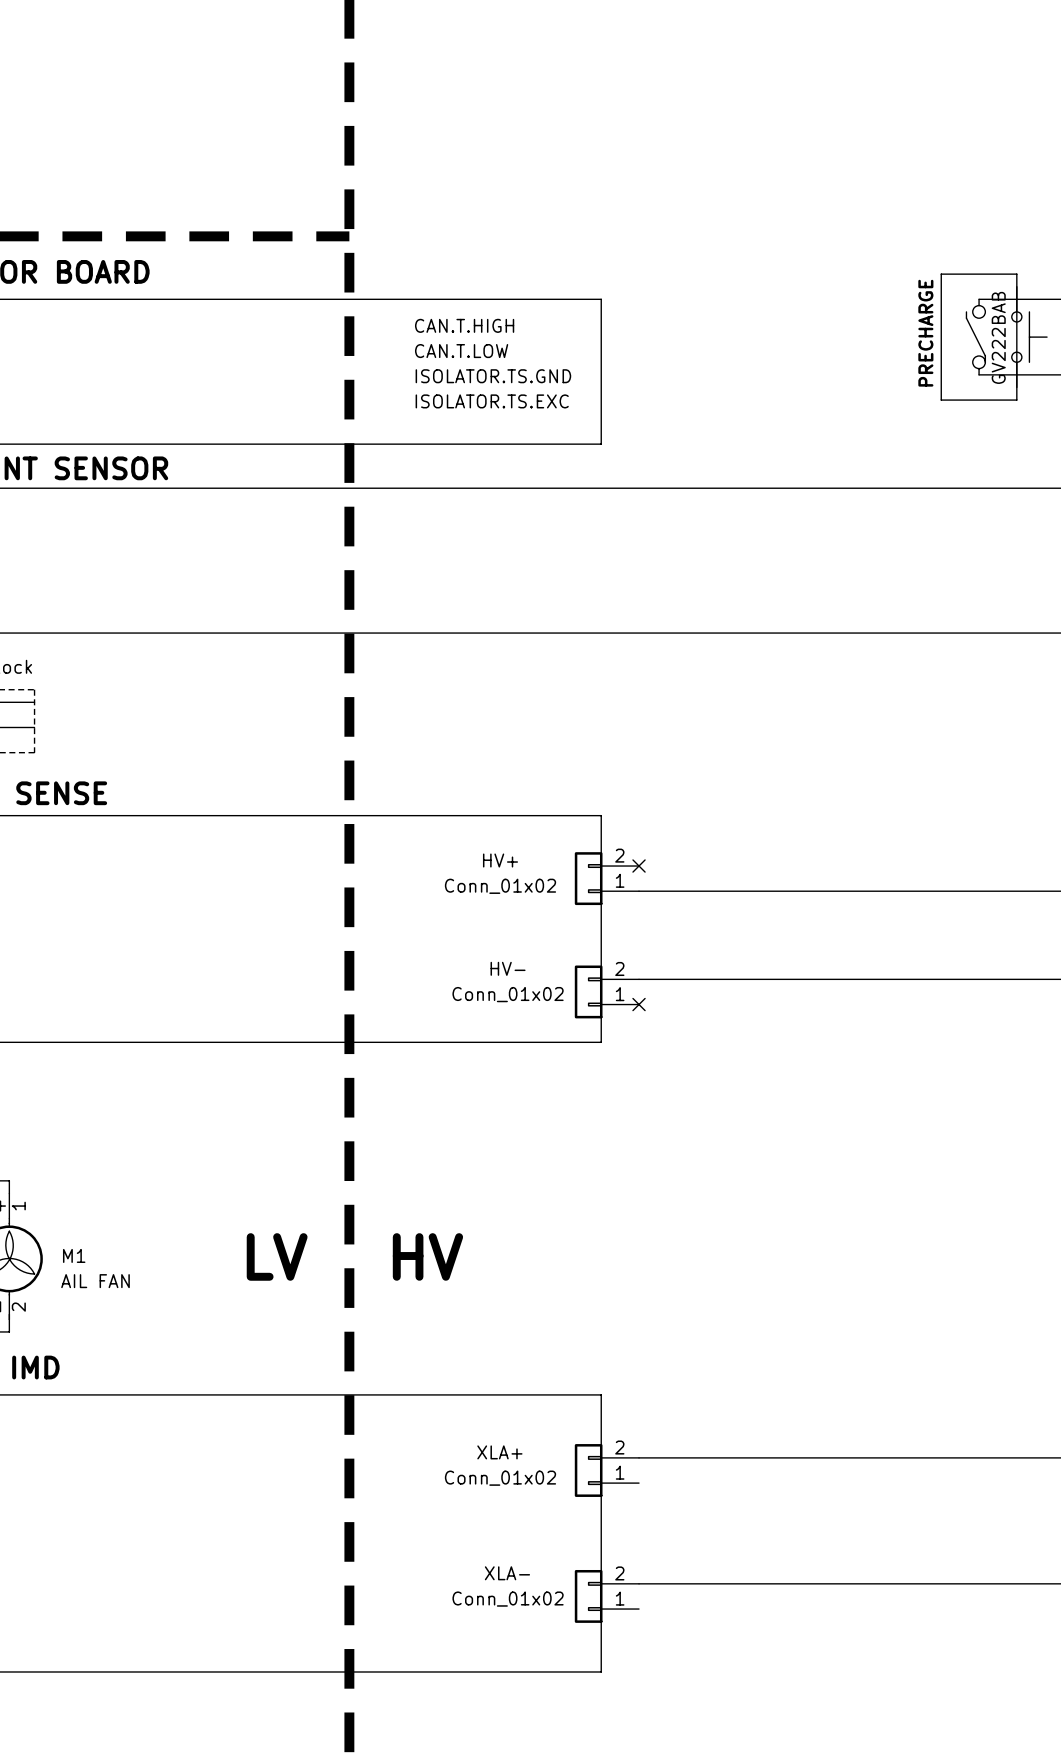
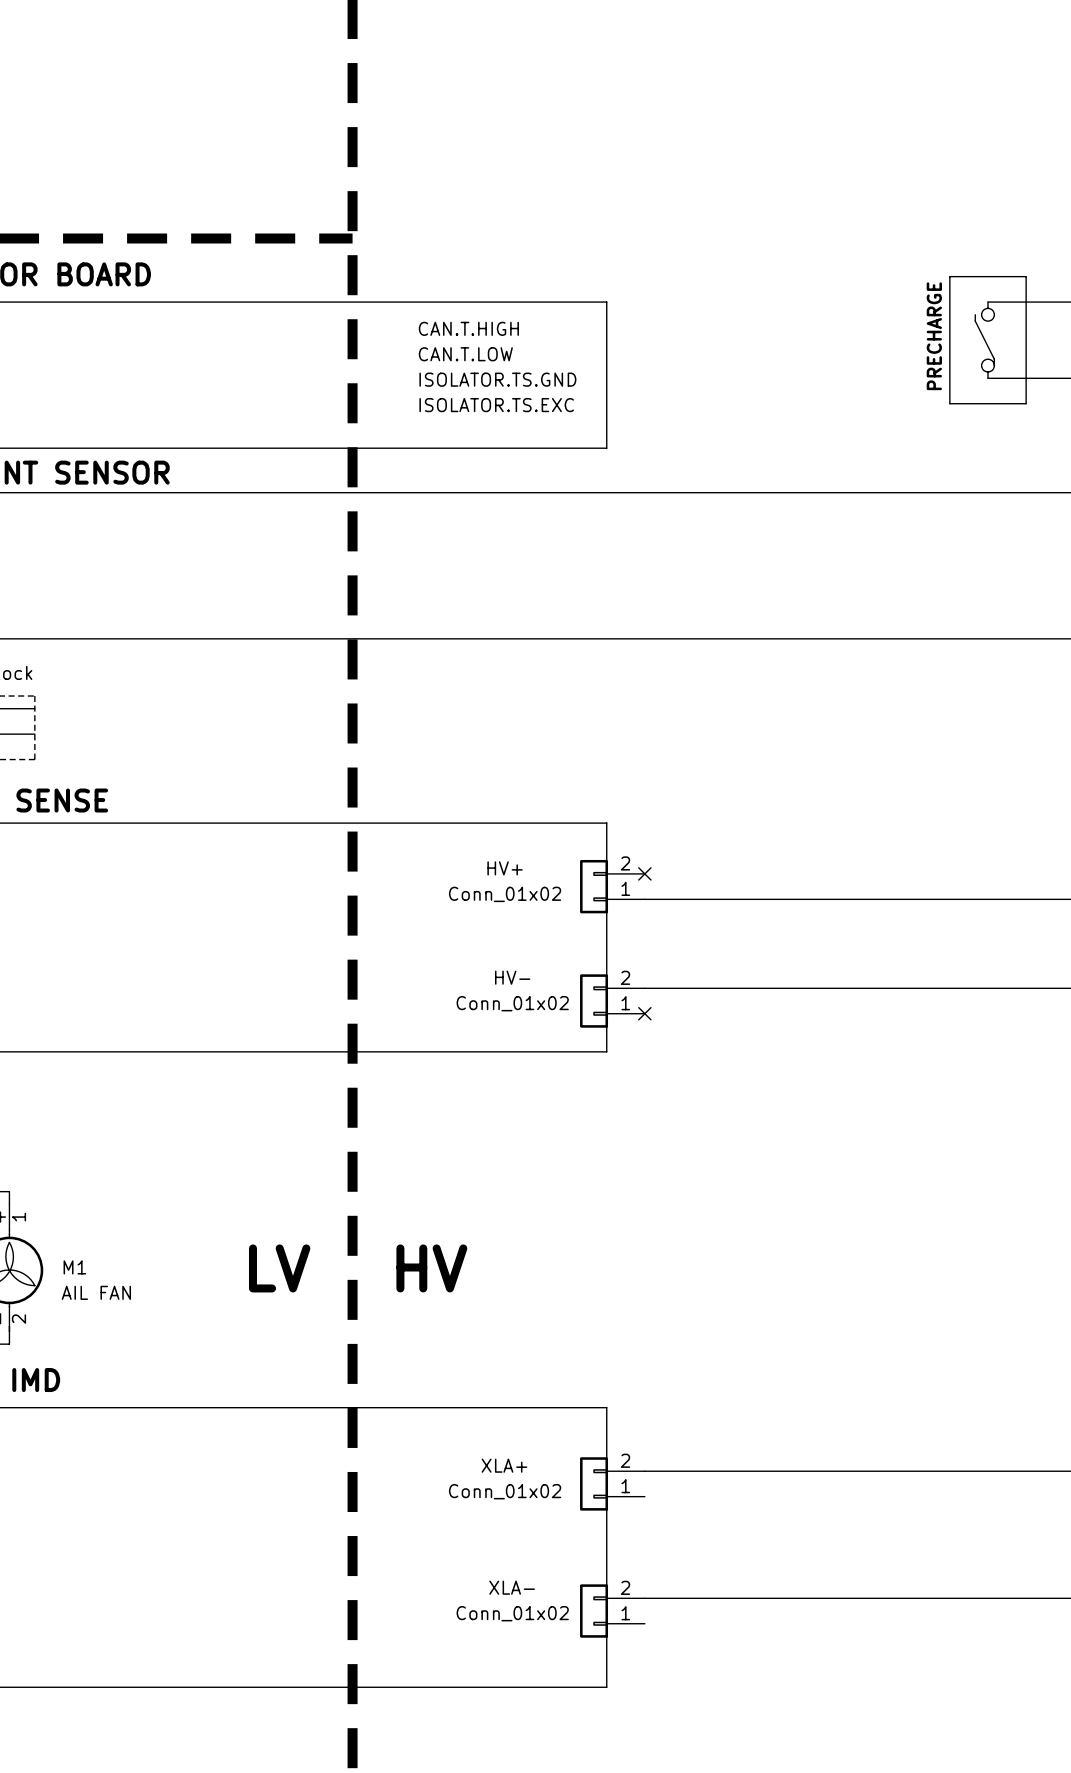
part: GV222BAB (1029, 337) -> none

